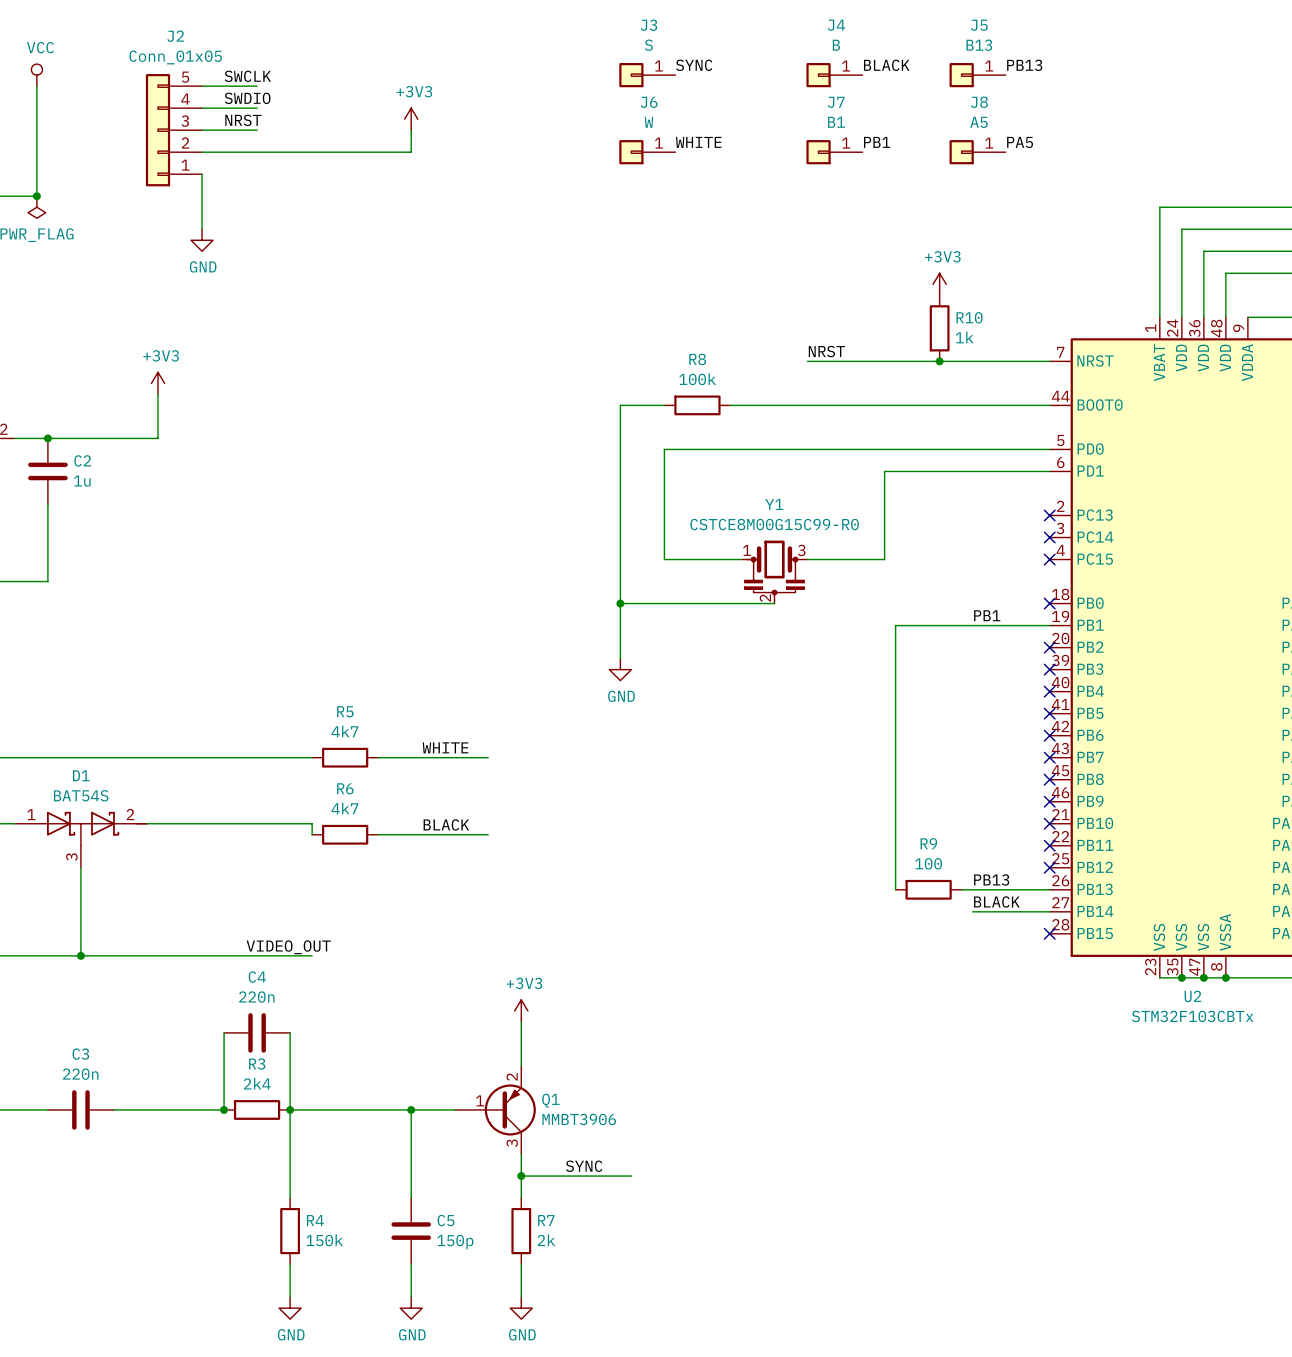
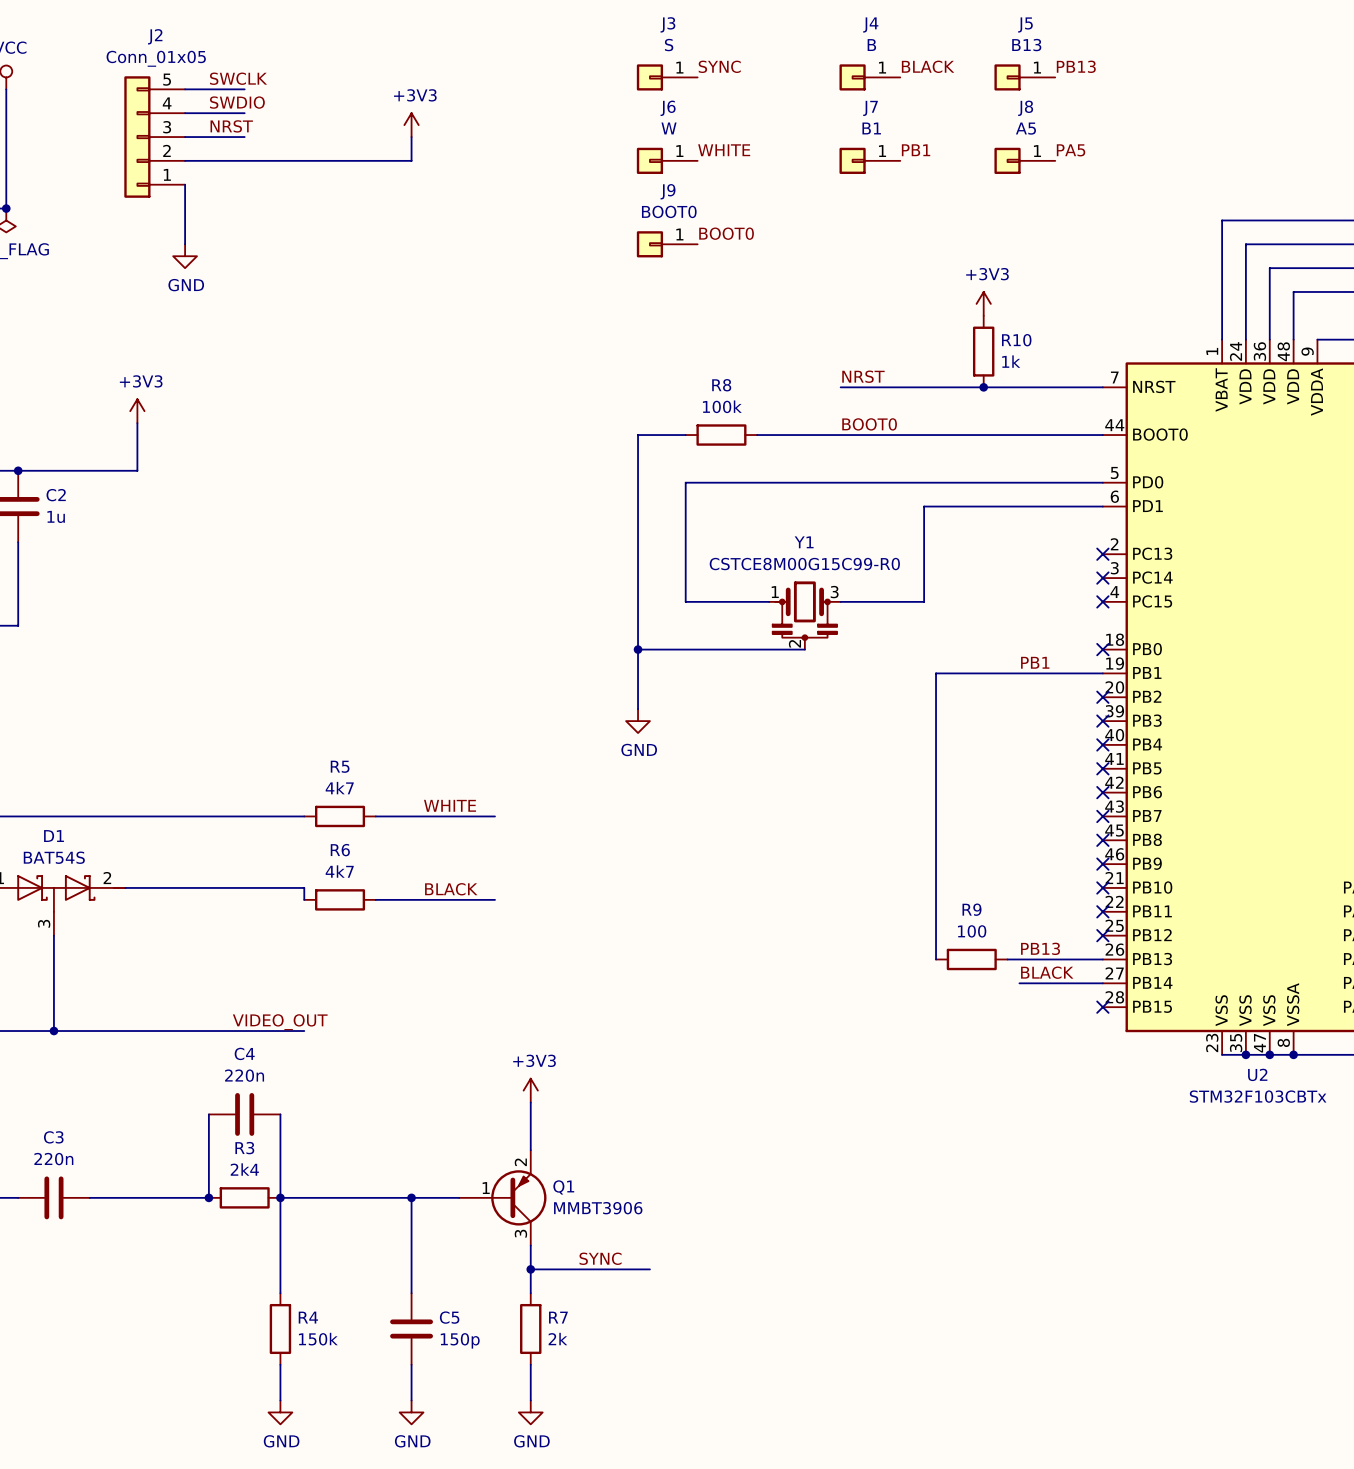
label: none -> BOOT0 (726, 233)
J9: none -> BOOT0 (667, 244)
label: none -> BOOT0 (869, 424)

